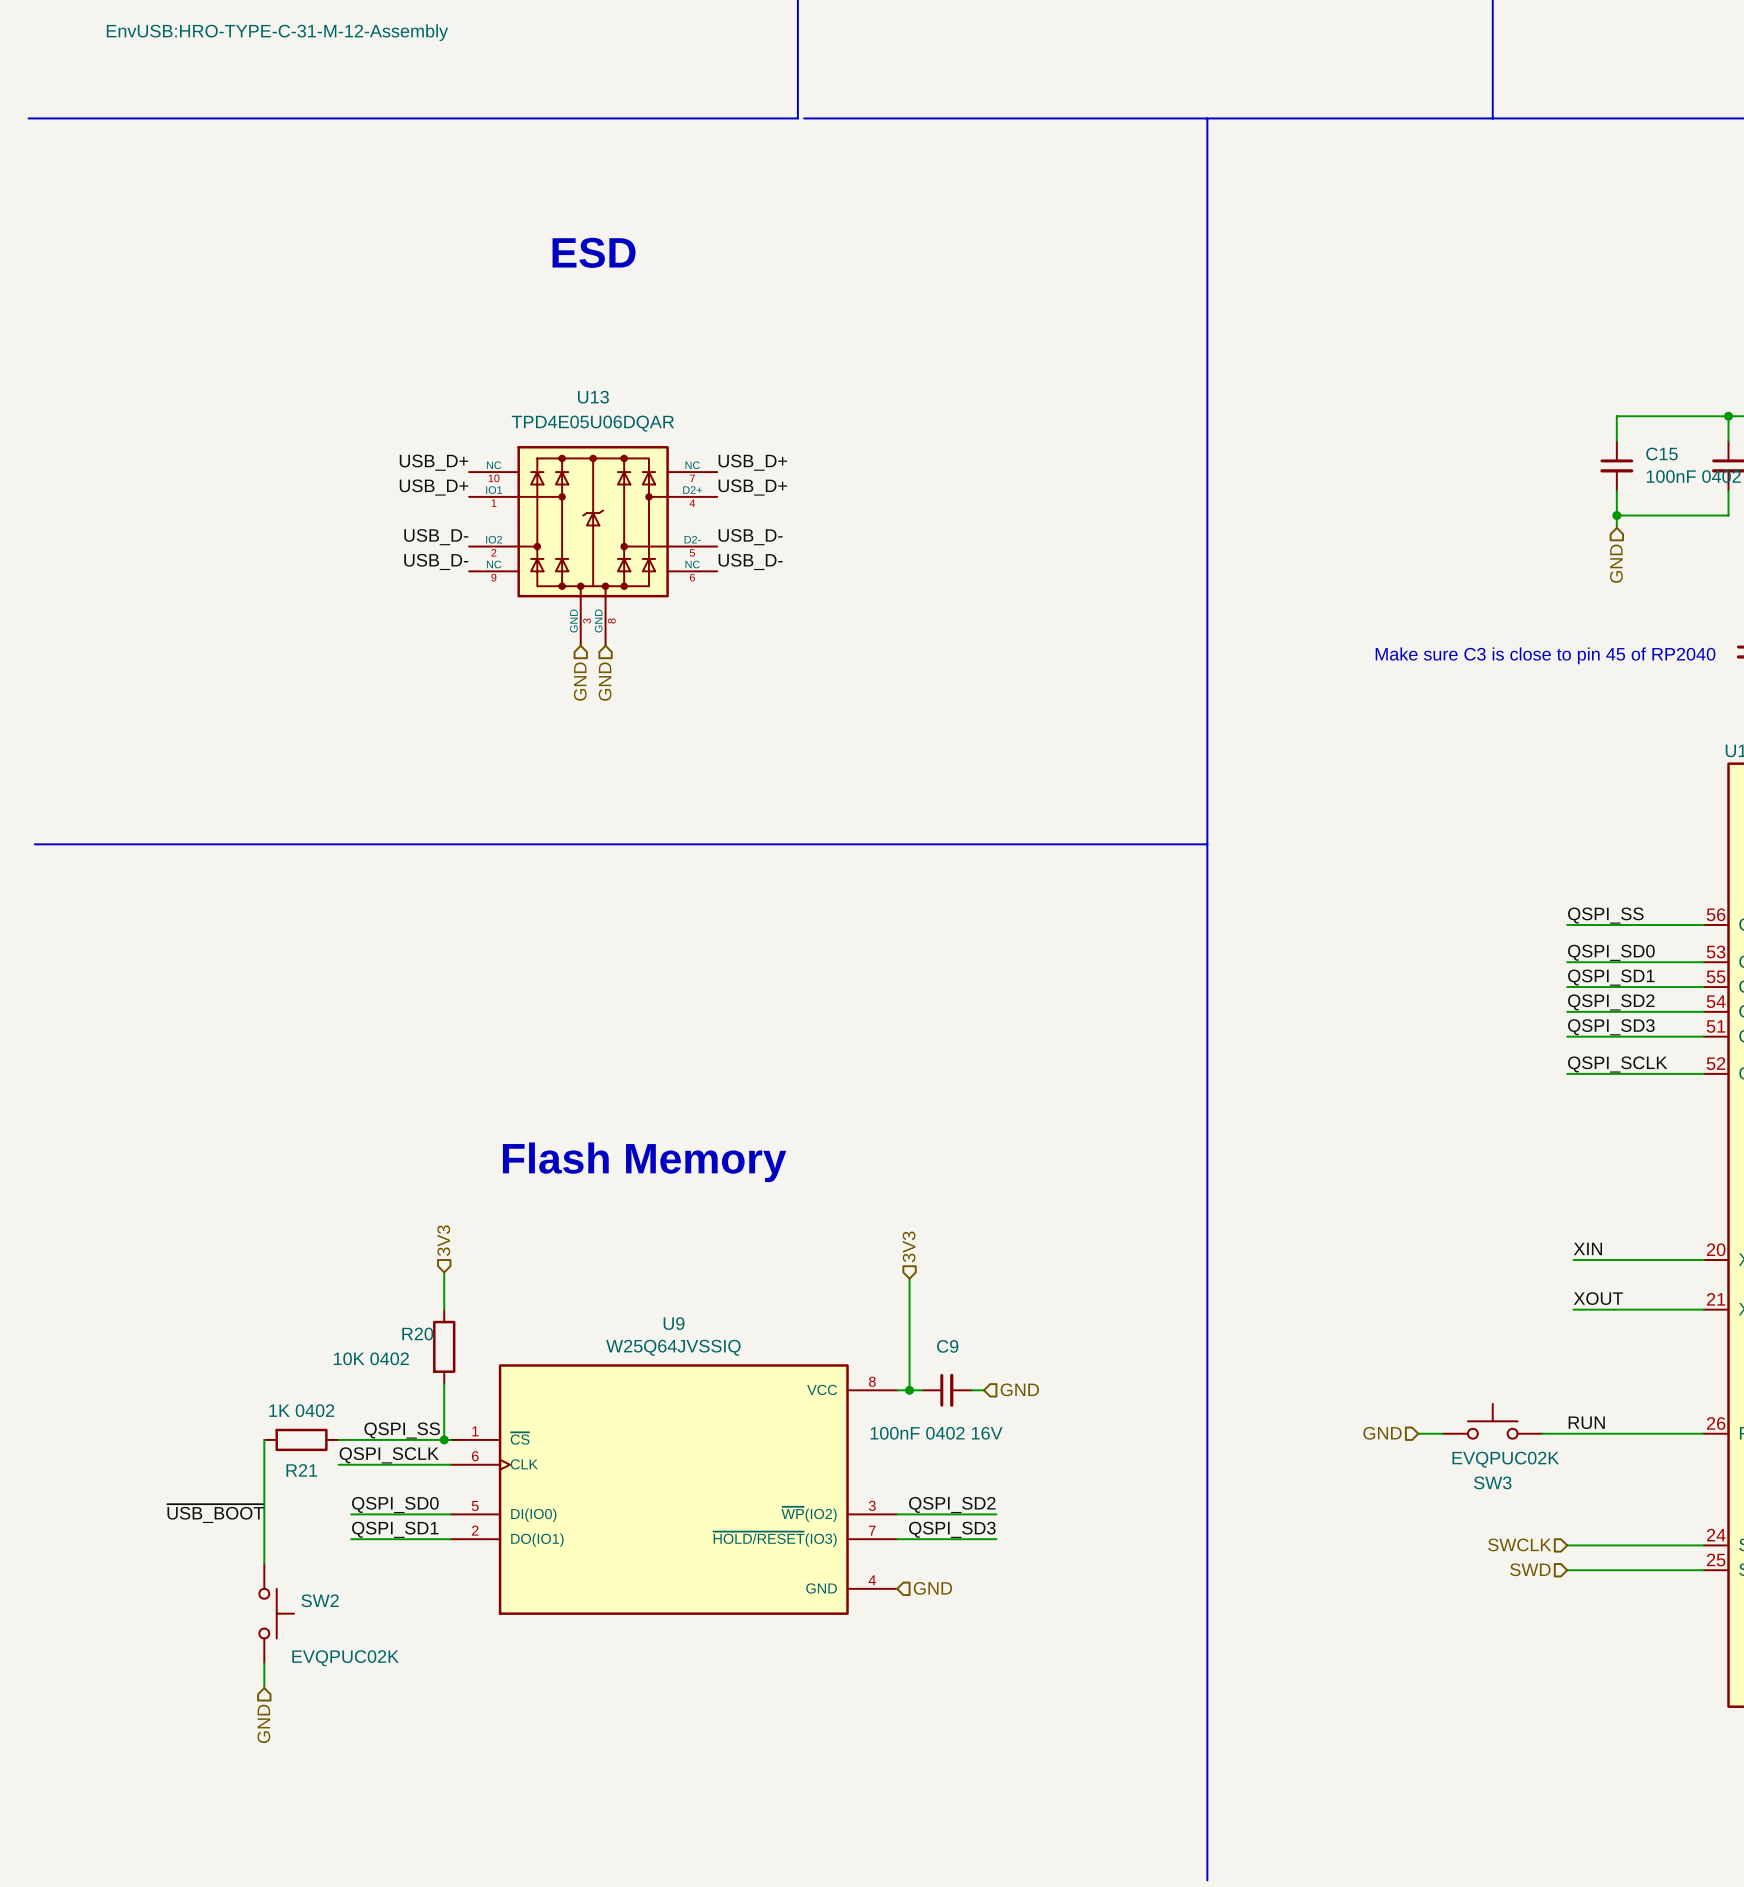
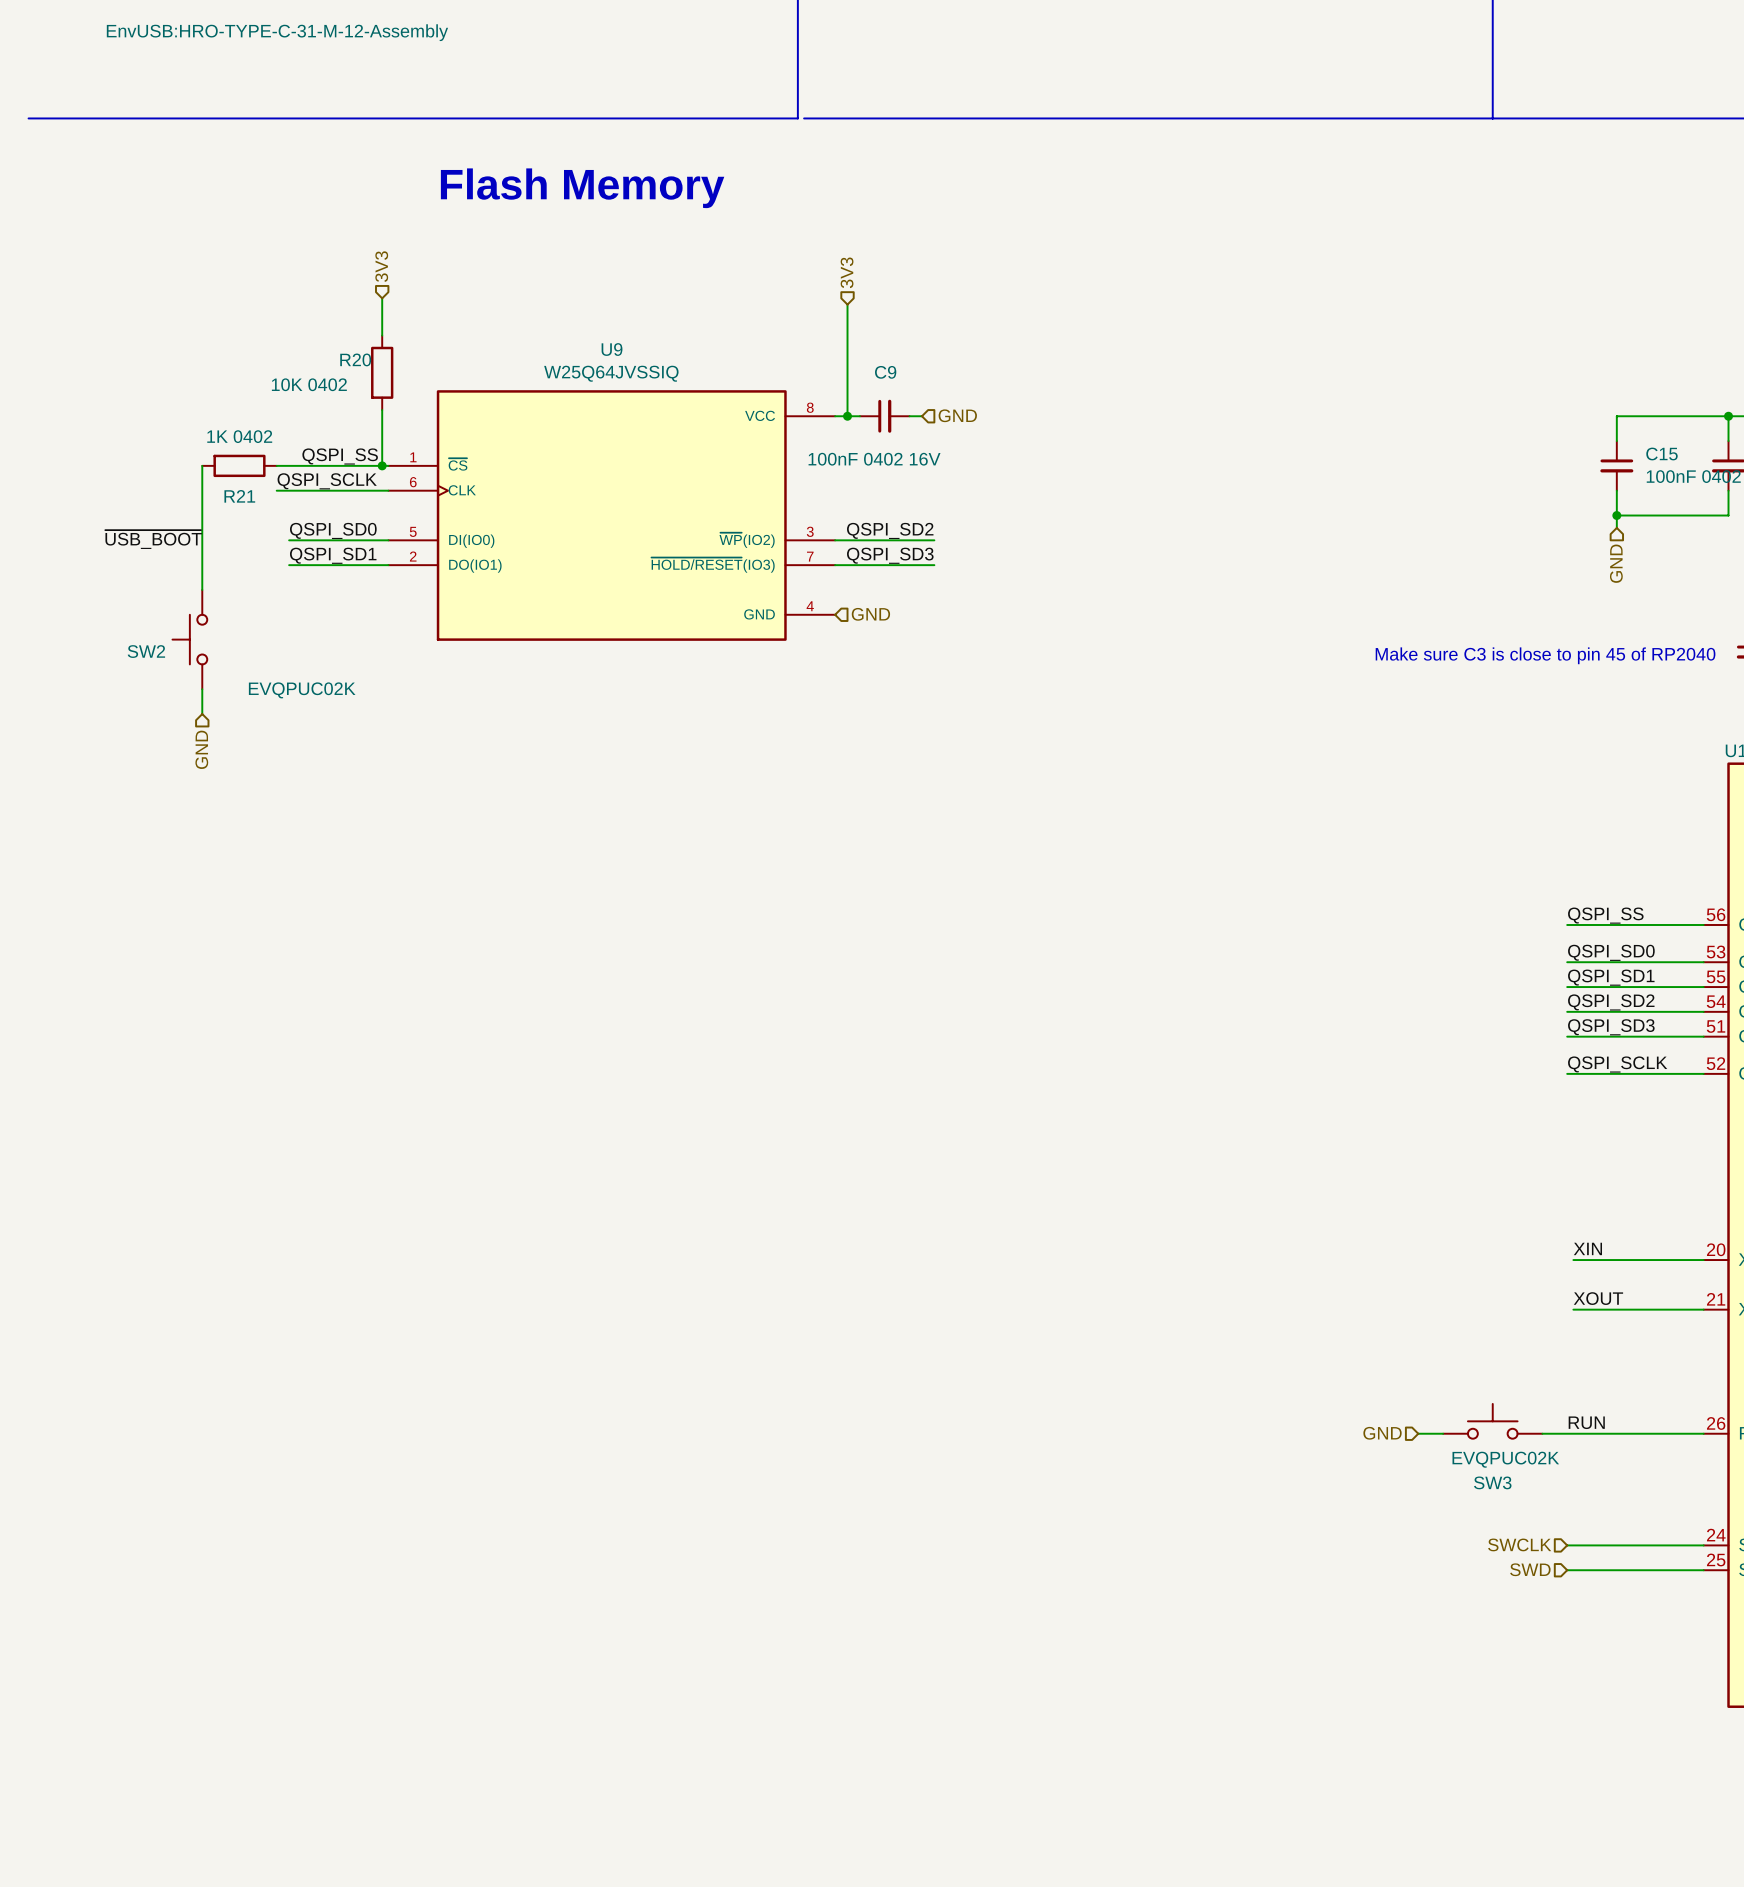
line: (1207, 118) (1207, 1880) -> none
text: none -> Flash Memory (582, 188)
text: ESD (594, 252) -> none
hierarchical label: none -> 3V3 (381, 266)
hierarchical label: none -> 3V3 (847, 272)
wire: none -> (382, 298) (382, 335)
wire: none -> (847, 304) (847, 416)
wire: none -> (382, 410) (382, 465)
hierarchical label: none -> GND (957, 415)
wire: none -> (835, 416) (859, 416)
junction: none -> (847, 416)
wire: none -> (909, 416) (921, 416)
label: none -> QSPI_SS (340, 456)
label: USB_D+ (433, 462) -> none
label: USB_D+ (752, 462) -> none
wire: none -> (202, 465) (202, 589)
wire: none -> (276, 465) (388, 465)
junction: none -> (382, 465)
label: none -> QSPI_SCLK (327, 481)
label: USB_D+ (433, 487) -> none
label: USB_D+ (752, 487) -> none
wire: none -> (276, 490) (388, 490)
label: none -> QSPI_SD0 (333, 530)
label: none -> QSPI_SD2 (890, 530)
label: USB_D- (436, 537) -> none
label: USB_D- (750, 537) -> none
label: none -> ~{USB_BOOT} (153, 539)
wire: none -> (289, 540) (388, 540)
wire: none -> (835, 540) (934, 540)
U13: TPD4E05U06DQAR (593, 545) -> none
label: none -> QSPI_SD1 (333, 555)
label: none -> QSPI_SD3 (890, 555)
label: USB_D- (436, 561) -> none
label: USB_D- (750, 561) -> none
wire: none -> (289, 565) (388, 565)
wire: none -> (835, 565) (934, 565)
hierarchical label: none -> GND (870, 614)
hierarchical label: GND (580, 681) -> none
hierarchical label: GND (605, 681) -> none
wire: none -> (202, 689) (202, 714)
hierarchical label: none -> GND (201, 749)
line: (34, 844) (1207, 844) -> none
text: Flash Memory (644, 1162) -> none
hierarchical label: 3V3 (443, 1240) -> none
hierarchical label: 3V3 (909, 1246) -> none
wire: (444, 1272) (444, 1309) -> none
wire: (909, 1278) (909, 1390) -> none
R20 position: (444, 1346) -> (382, 372)
wire: (444, 1384) (444, 1439) -> none
hierarchical label: GND (1019, 1389) -> none
wire: (897, 1390) (921, 1390) -> none
junction: (909, 1390) -> none
C9 position: (946, 1390) -> (884, 416)
wire: (971, 1390) (984, 1390) -> none
label: QSPI_SS (402, 1430) -> none
wire: (264, 1439) (264, 1564) -> none
R21 position: (301, 1439) -> (239, 465)
wire: (338, 1439) (450, 1439) -> none
junction: (444, 1439) -> none
label: QSPI_SCLK (389, 1455) -> none
wire: (338, 1464) (450, 1464) -> none
U9 position: (673, 1489) -> (611, 515)
label: QSPI_SD0 (395, 1505) -> none
label: QSPI_SD2 (952, 1505) -> none
label: ~{USB_BOOT} (215, 1513) -> none
wire: (351, 1514) (450, 1514) -> none
wire: (897, 1514) (996, 1514) -> none
label: QSPI_SD1 (395, 1529) -> none
label: QSPI_SD3 (952, 1529) -> none
wire: (351, 1539) (450, 1539) -> none
wire: (897, 1539) (996, 1539) -> none
hierarchical label: GND (932, 1588) -> none
SW2 rotation: 0° (276, 1613) -> 180° (189, 639)
SW2 position: (276, 1613) -> (189, 639)
SW2 value position: EVQPUC02K (345, 1658) -> EVQPUC02K (302, 690)
wire: (264, 1663) (264, 1688) -> none
hierarchical label: GND (263, 1723) -> none

